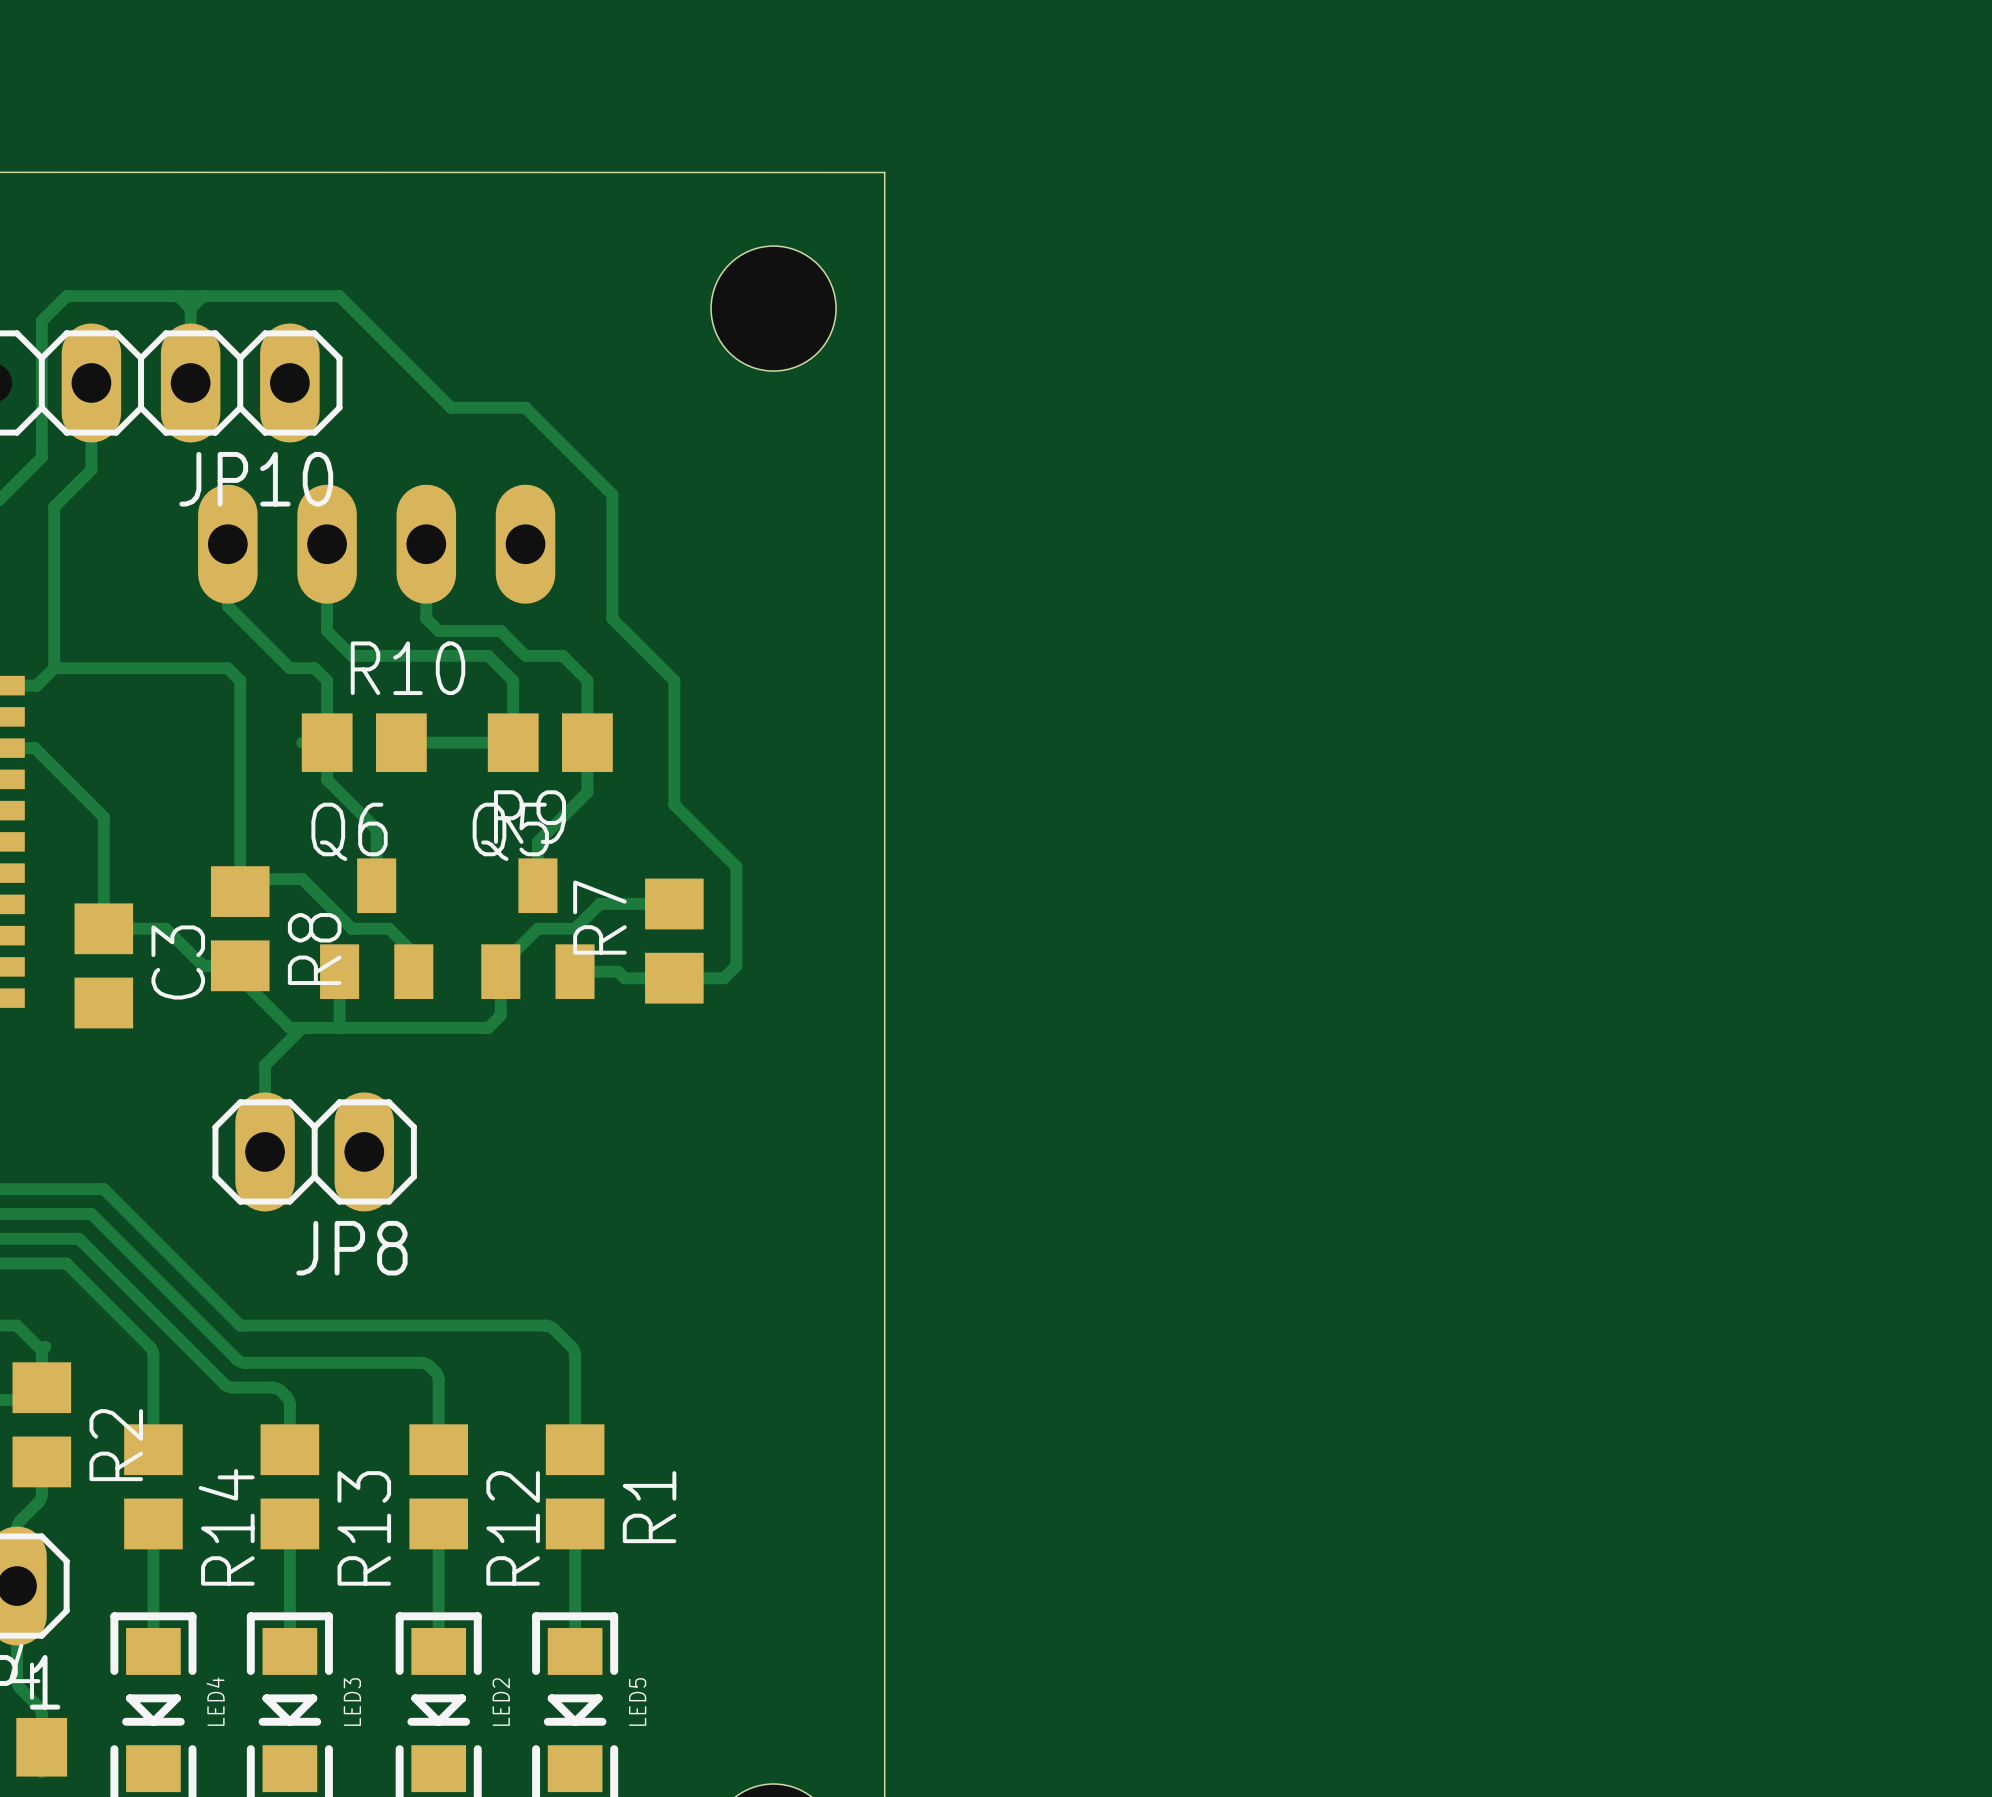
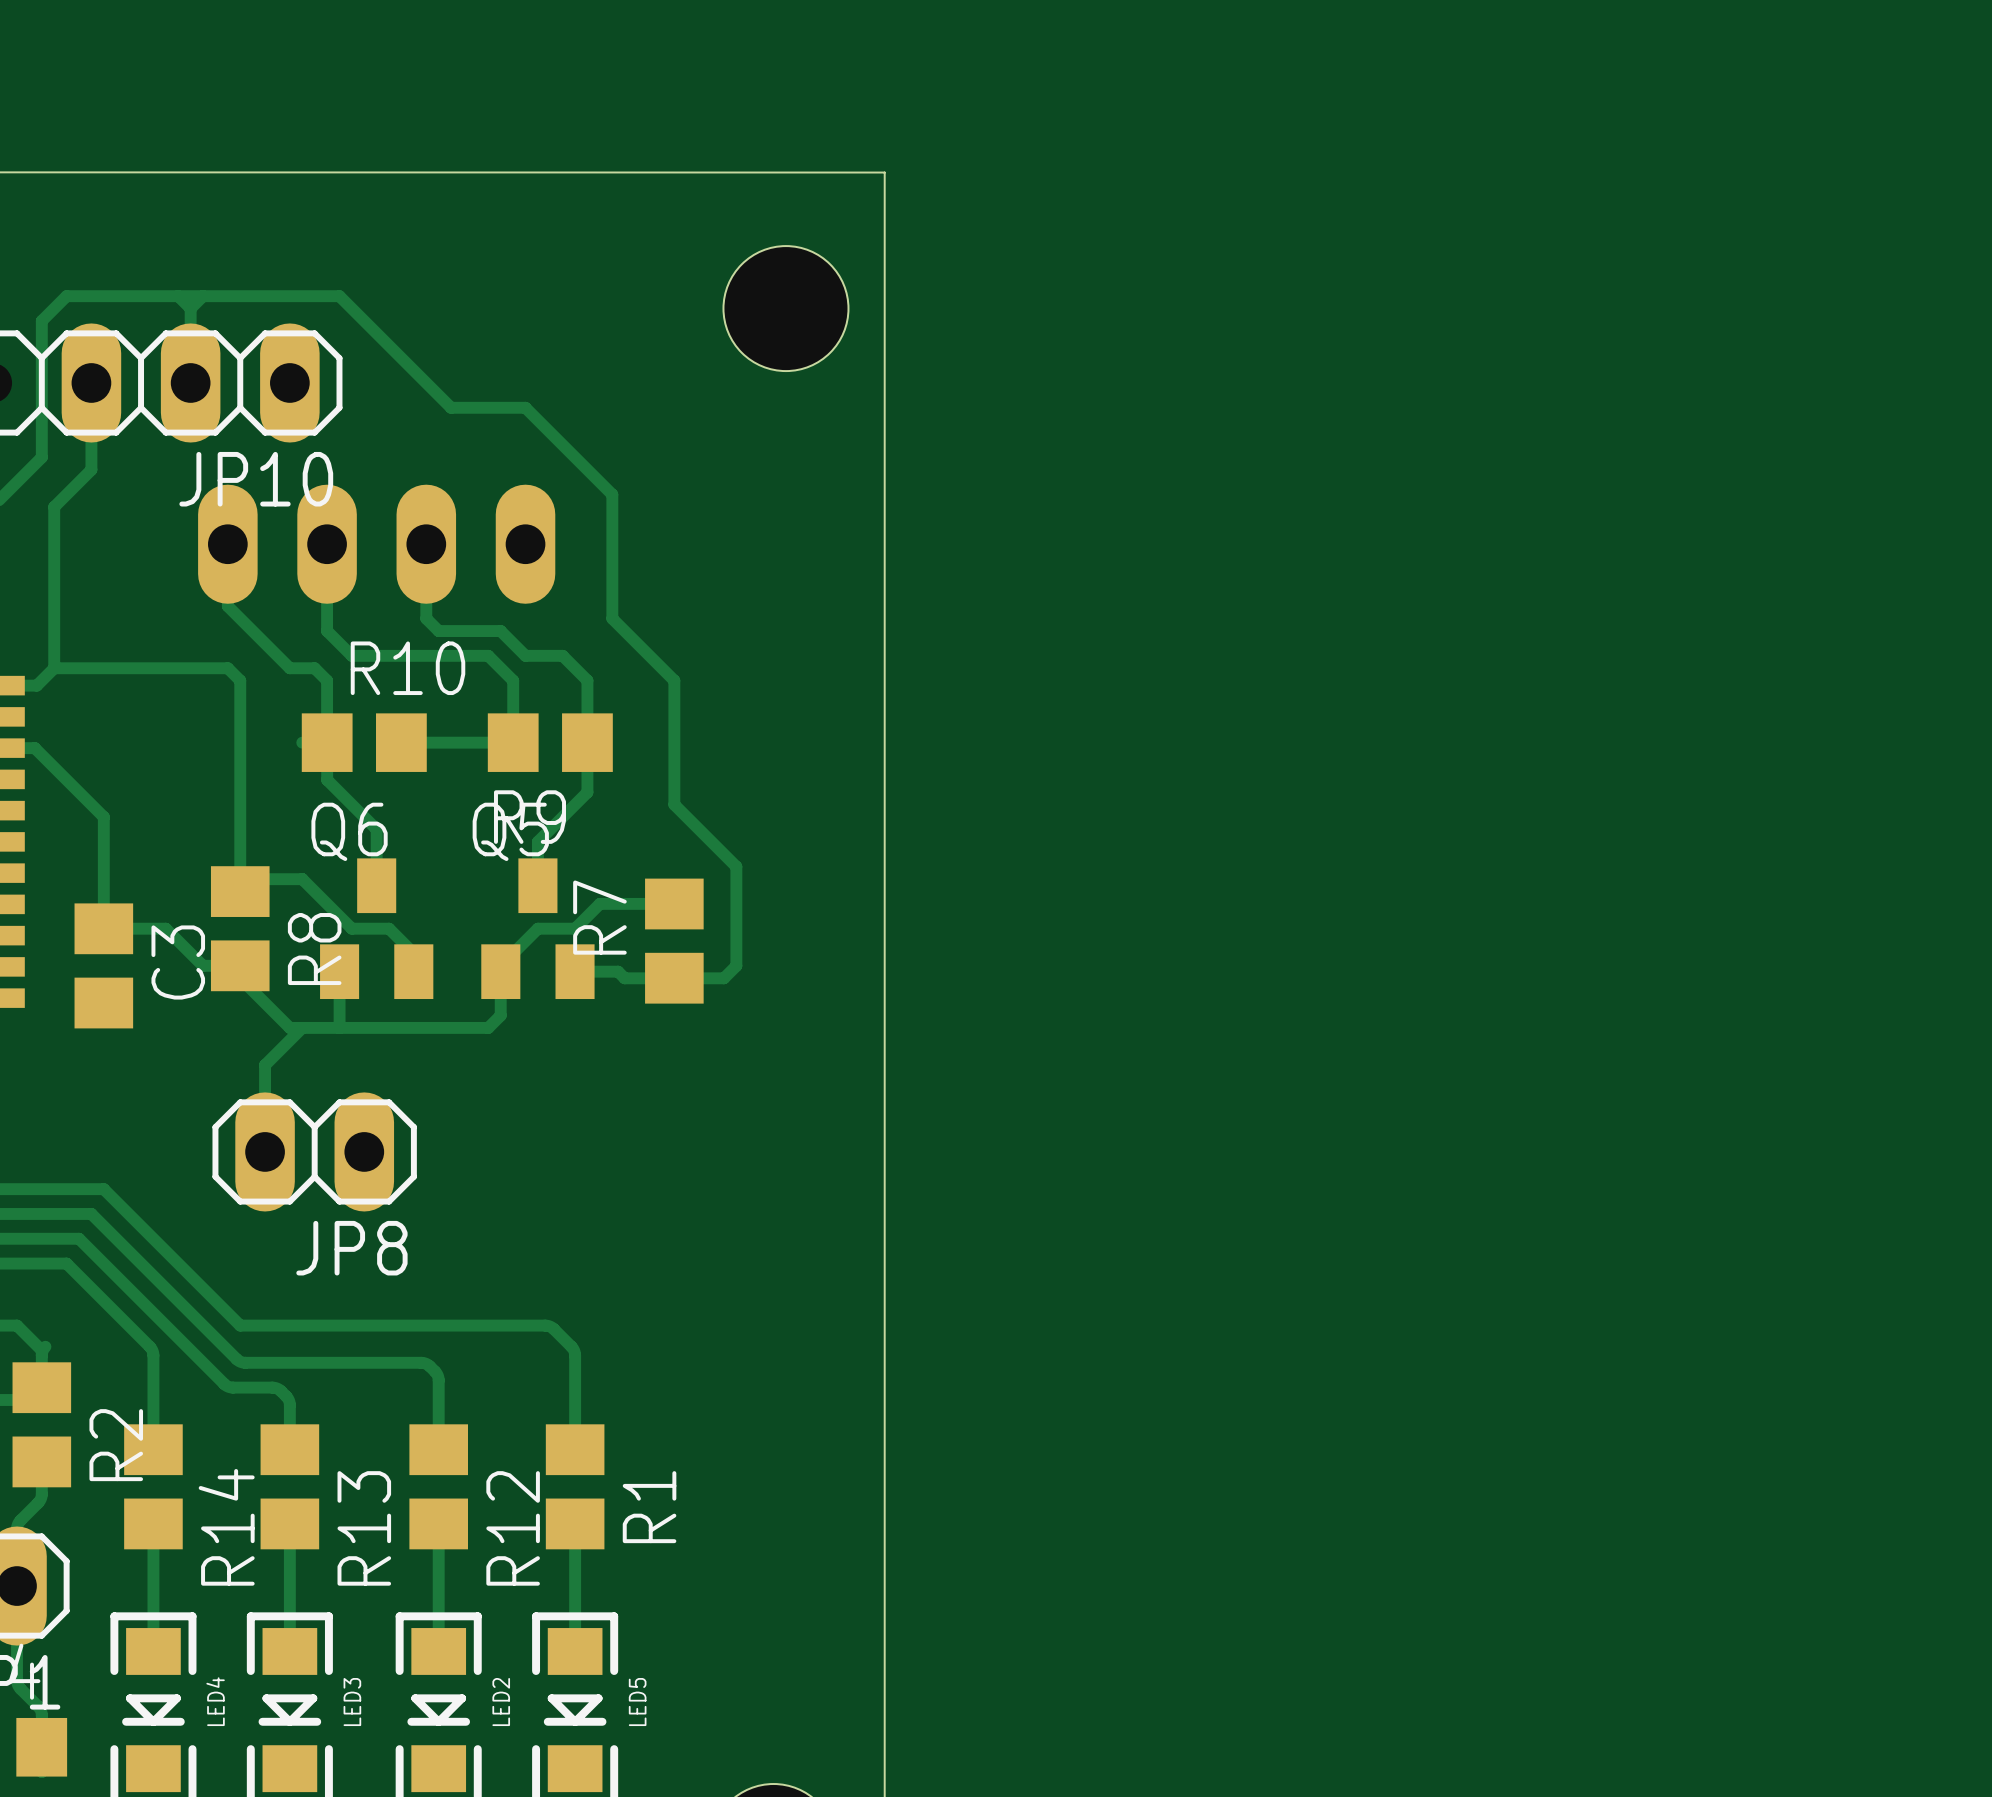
hole position: (773, 308) -> (785, 308)

